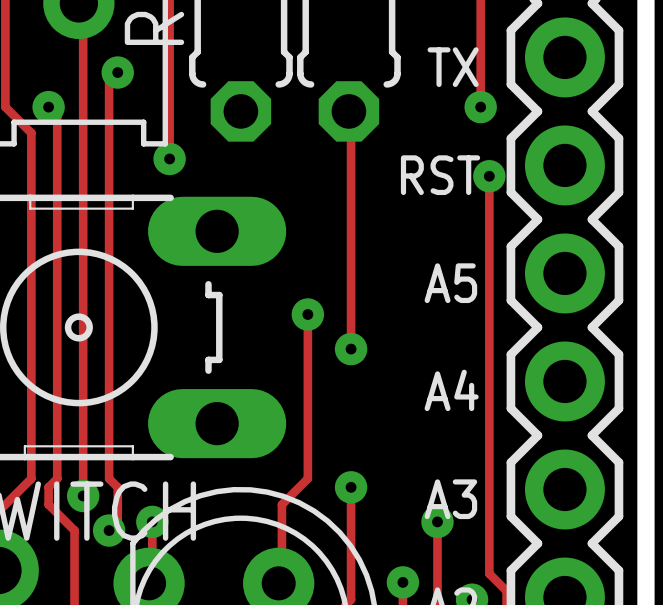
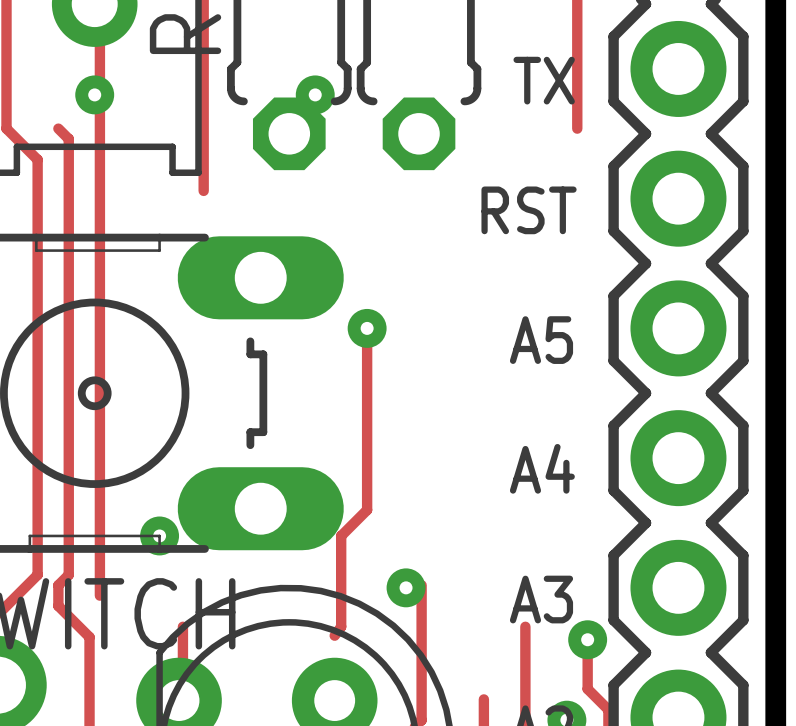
track: (117, 72) (109, 81) (109, 478) (117, 487) (117, 521) (109, 530) -> none
via: (117, 72) -> none
via: none -> (315, 94)
via position: (48, 107) -> (94, 94)
via: (480, 107) -> none
track: (348, 111) (351, 115) (351, 349) -> none
via: (169, 158) -> none
track: (489, 176) (489, 532) -> none
via: (489, 176) -> none
track: none -> (367, 328) (367, 510) (341, 535) (341, 626) (334, 635)
track: (307, 314) (307, 478) (281, 504) (281, 582) (278, 583) -> none
via position: (307, 314) -> (367, 328)
via: (351, 349) -> none
via: none -> (159, 535)
via position: (351, 487) -> (406, 587)
via: (83, 495) -> none
via: (152, 521) -> none
via: (437, 521) -> none
via: (109, 530) -> none
via: none -> (587, 639)
via: (402, 582) -> none

